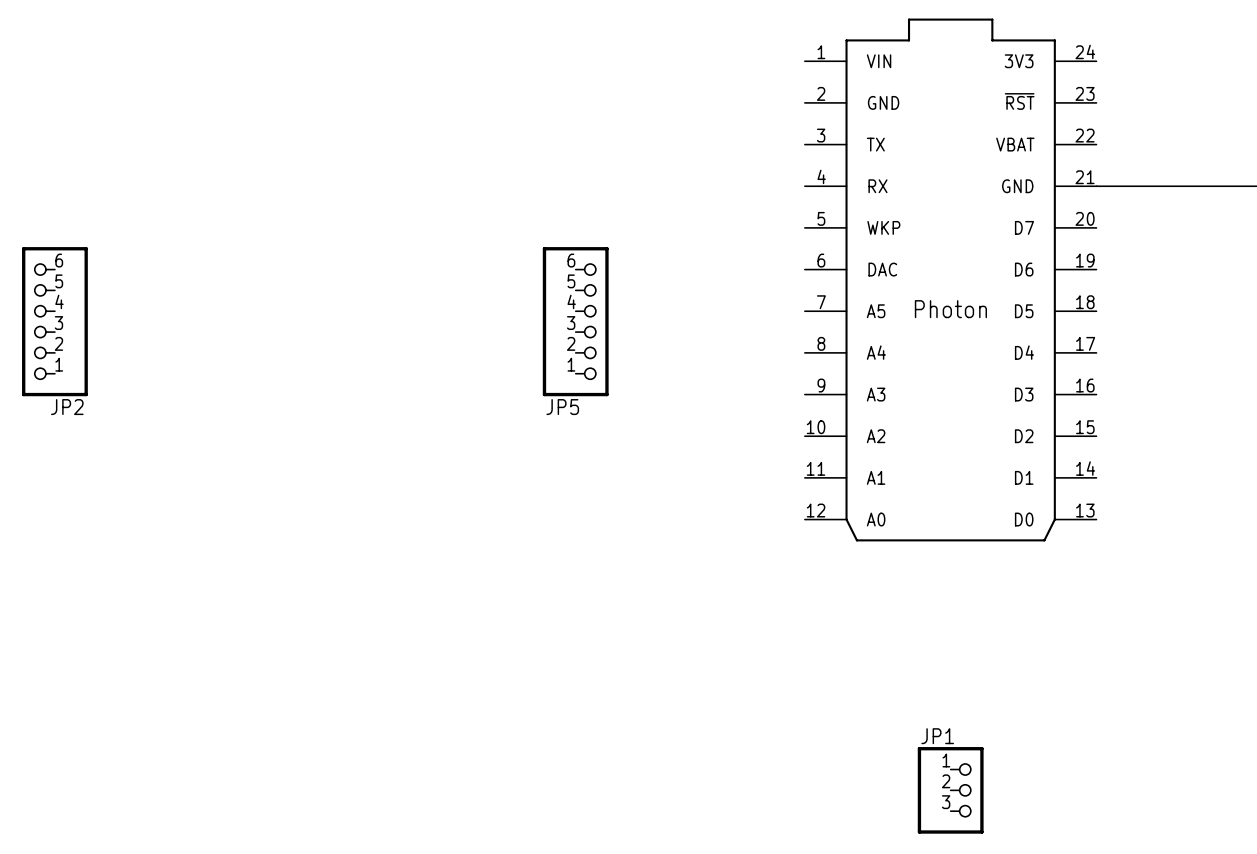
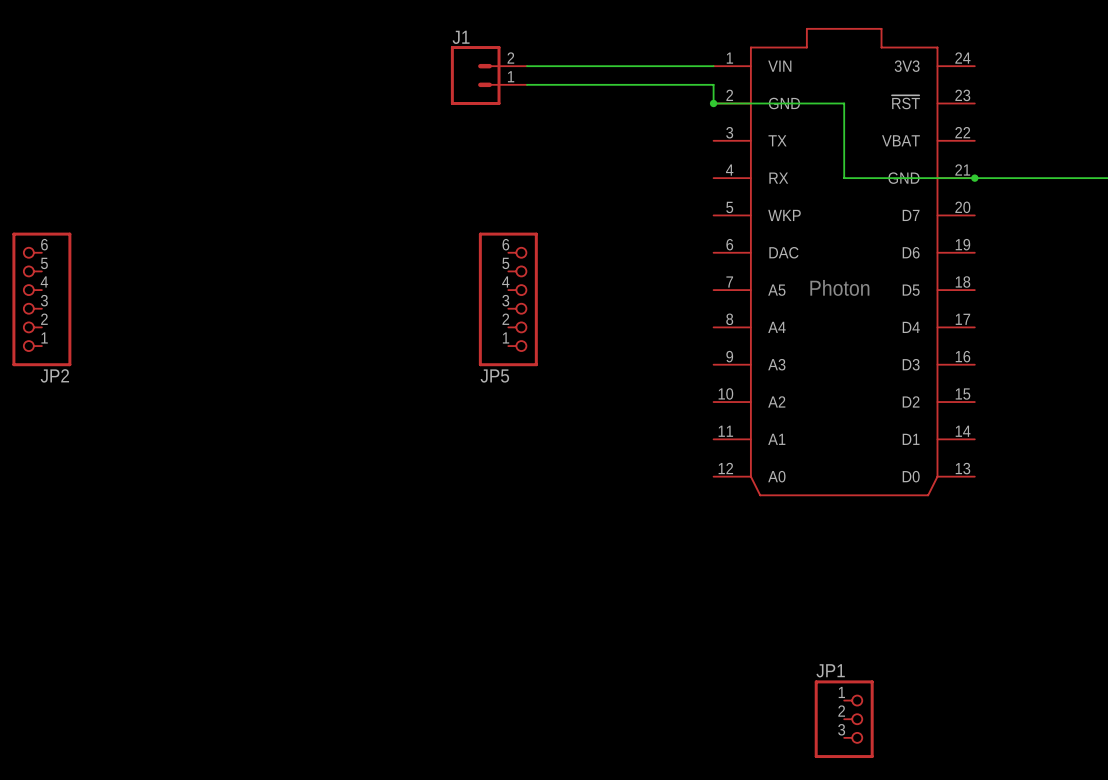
wire: none -> (527, 66) (713, 66)
J1: none -> (488, 75)
wire: none -> (527, 84) (713, 84) (713, 103) (844, 103) (844, 178) (974, 178)
junction: none -> (713, 103)
junction: none -> (974, 178)

